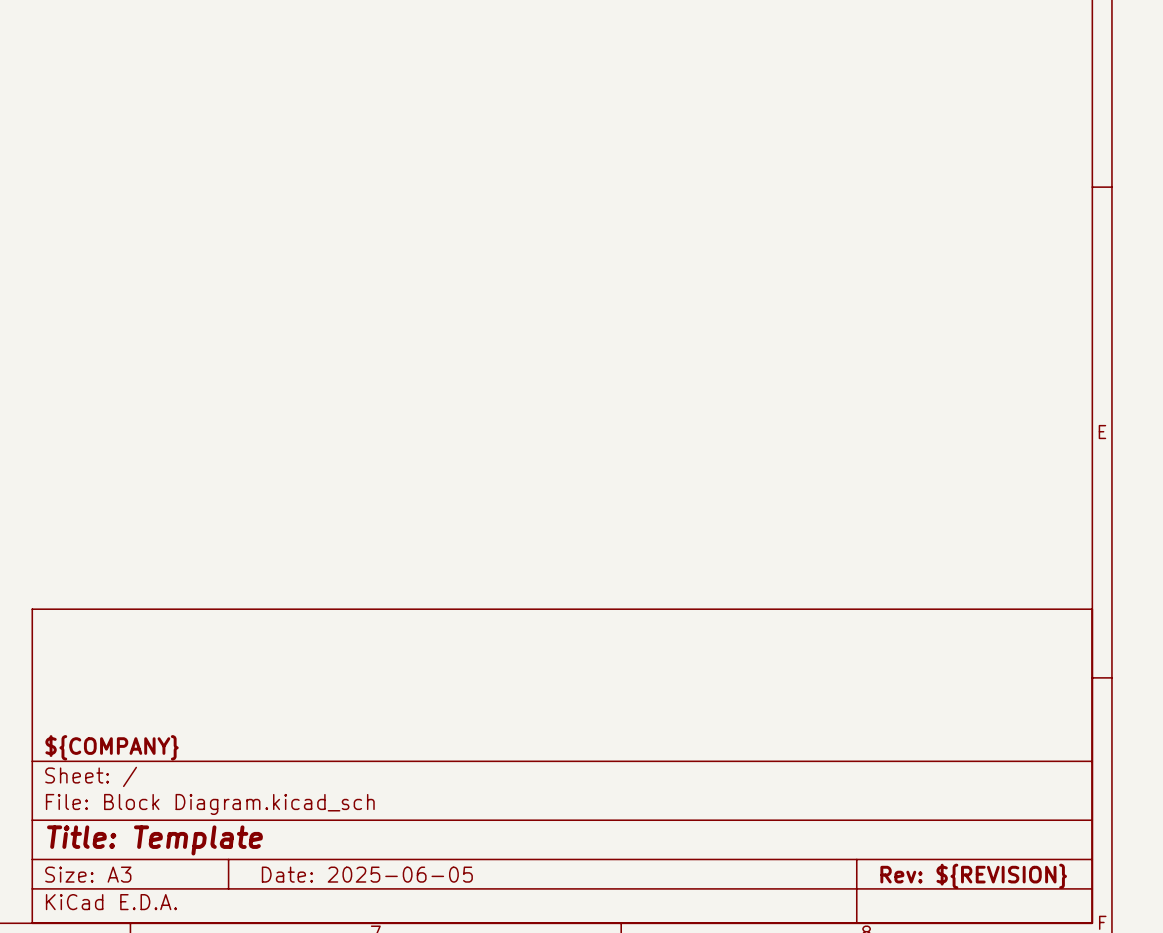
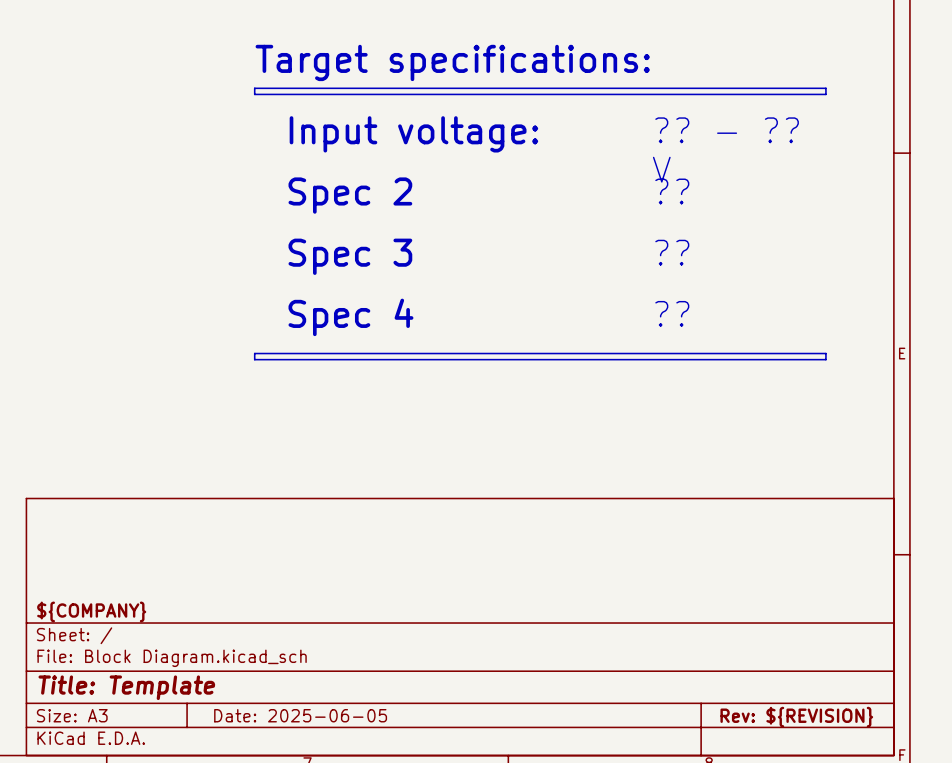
text: none -> Target specifications: (452, 62)
line: none -> (254, 88) (254, 94) (825, 94) (825, 88) (254, 88)
text: none -> ?? - ?? (727, 130)
text: none -> Input voltage: (413, 134)
text: none -> V (661, 169)
text: none -> ?? (672, 191)
text: none -> Spec 2 (350, 195)
text: none -> ?? (672, 252)
text: none -> Spec 3 (350, 256)
text: none -> ?? (672, 313)
text: none -> Spec 4 (350, 317)
line: none -> (254, 353) (825, 353) (825, 359) (254, 359) (254, 353)

